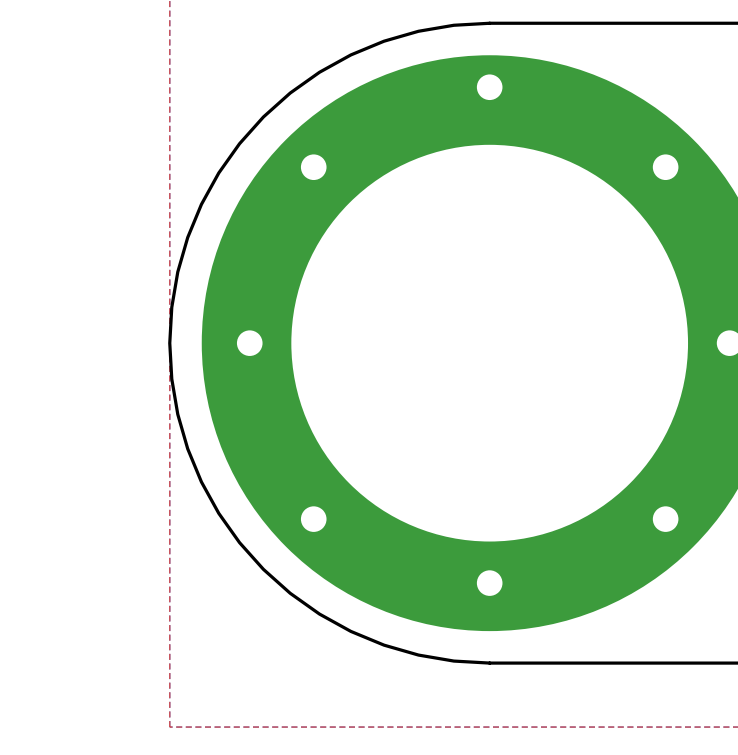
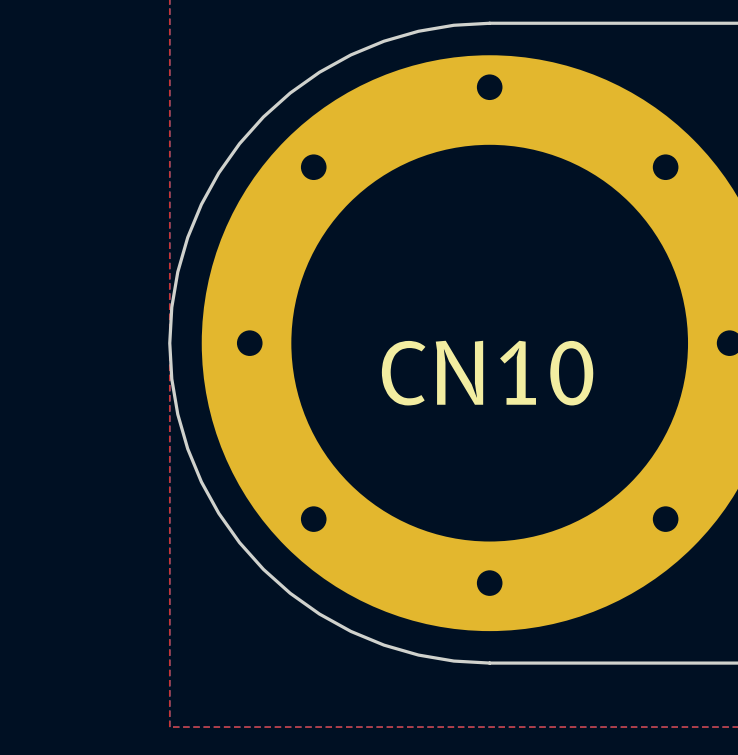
CN10 name: none -> CN10 (487, 373)

